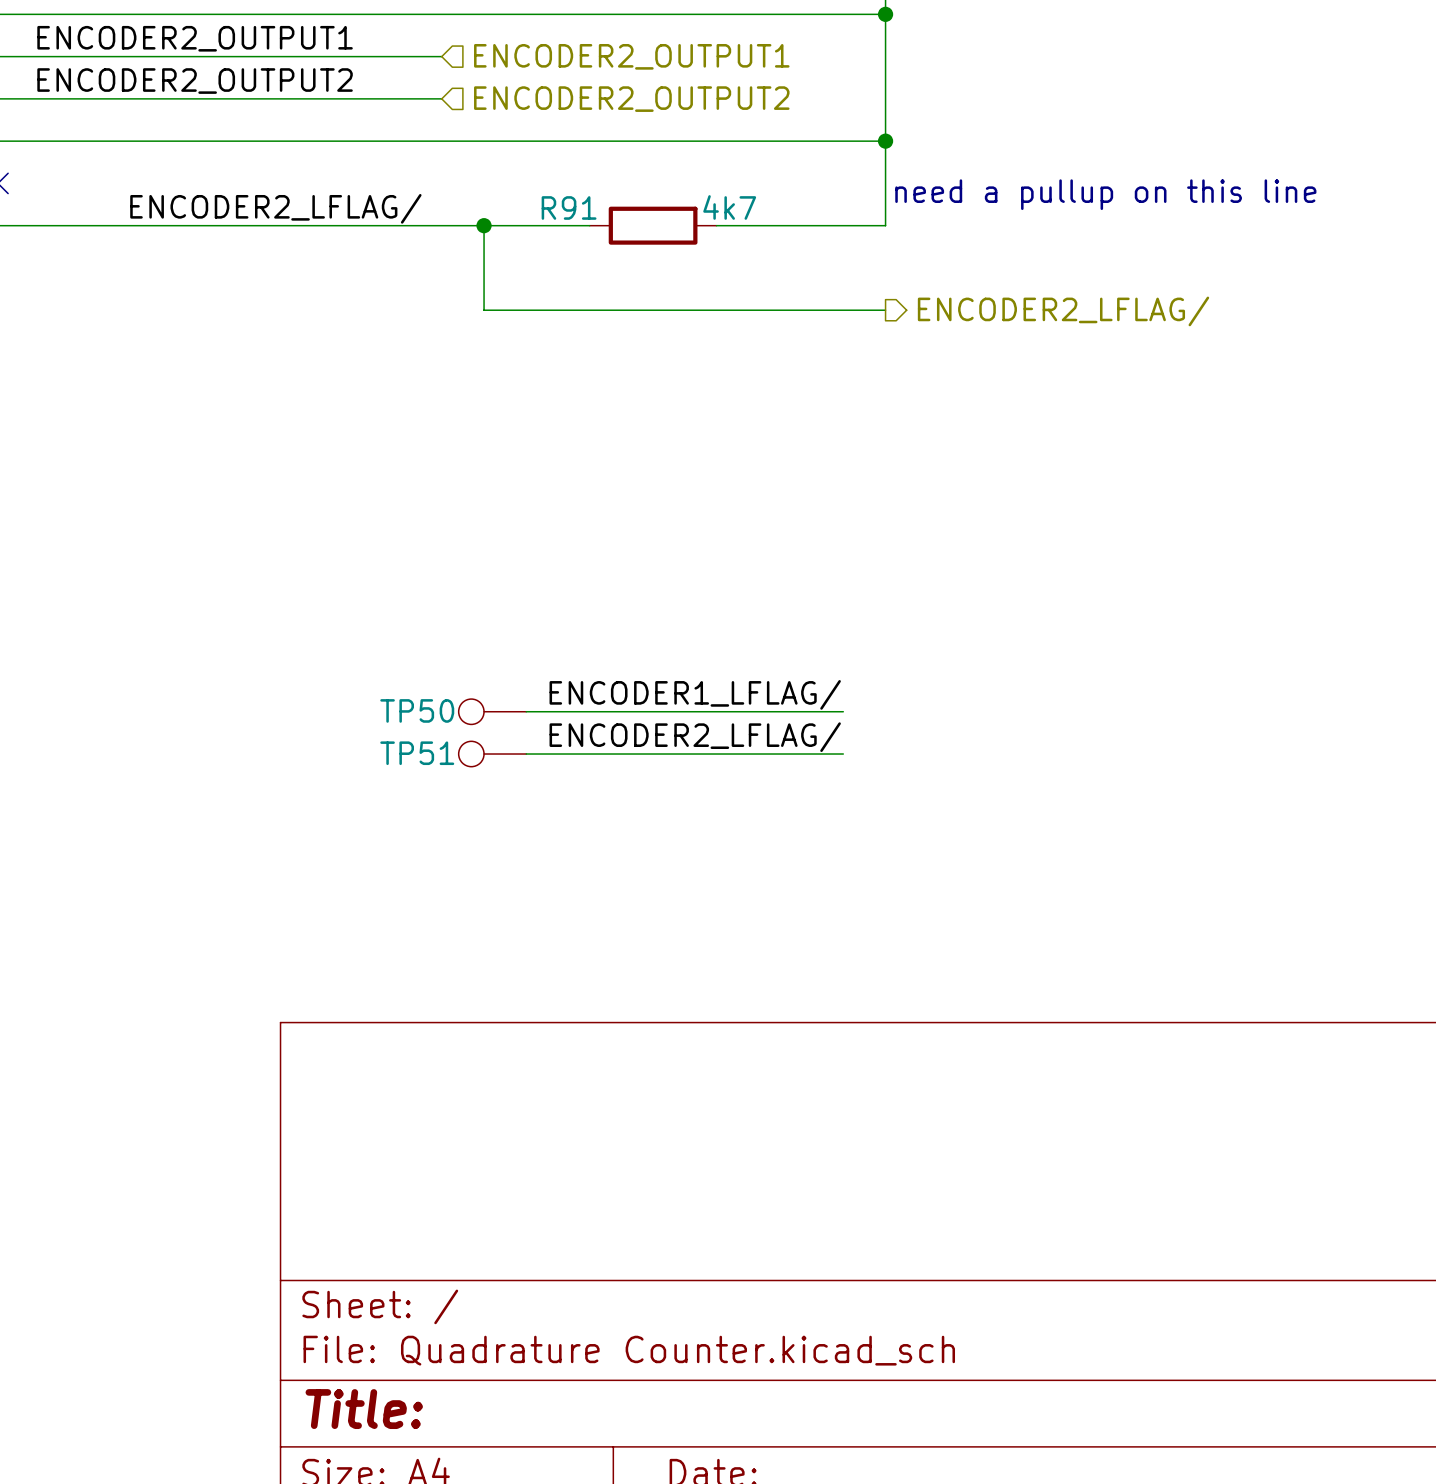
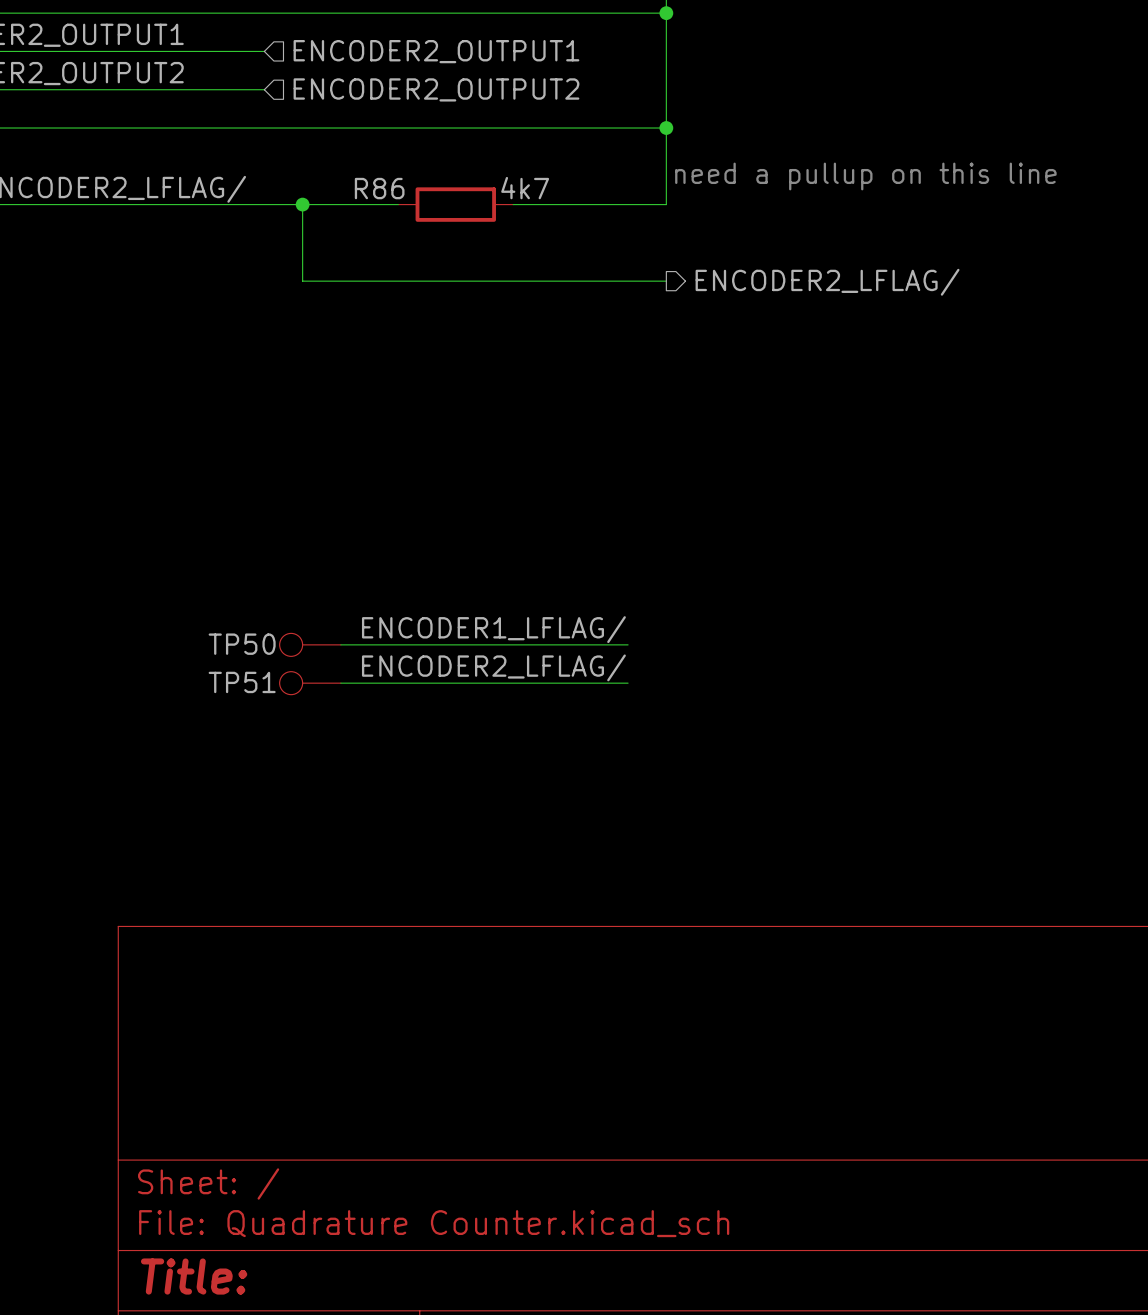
R91 name: R91 (569, 207) -> R86 (379, 188)

